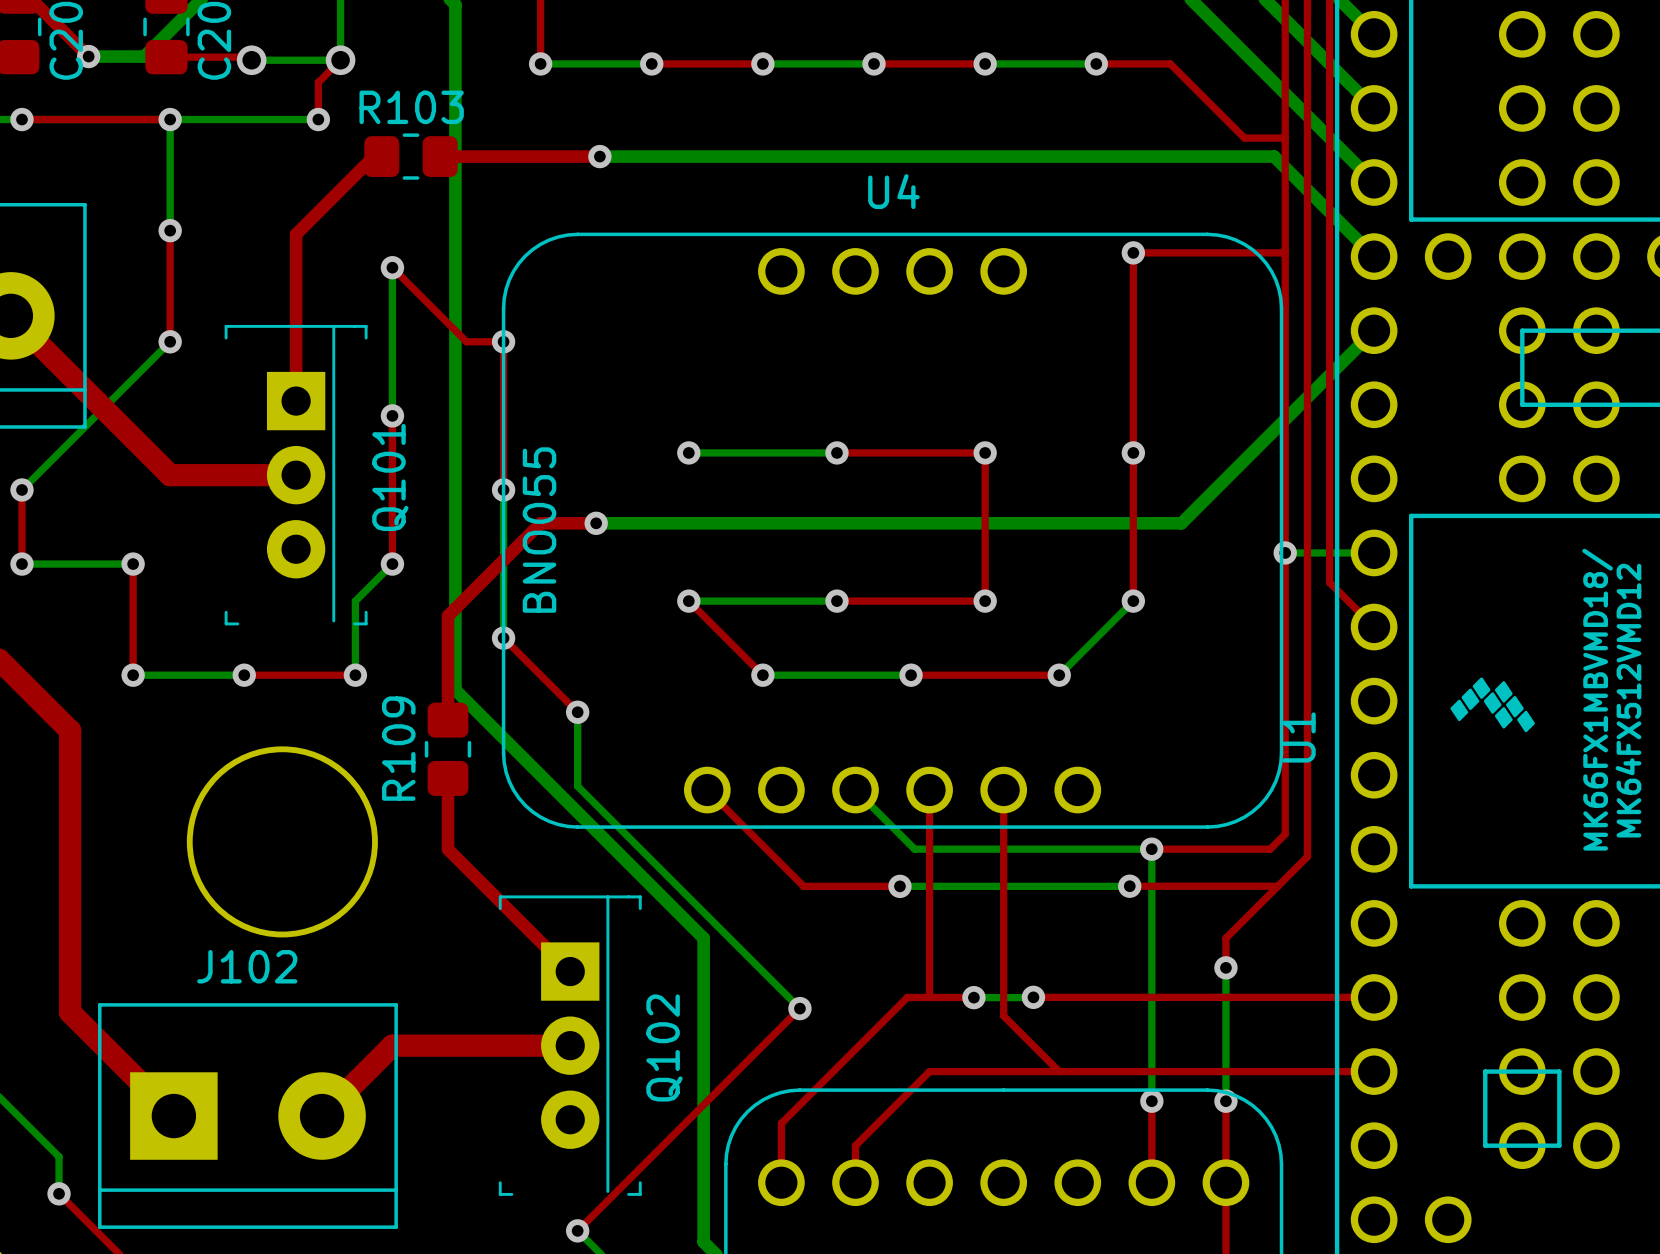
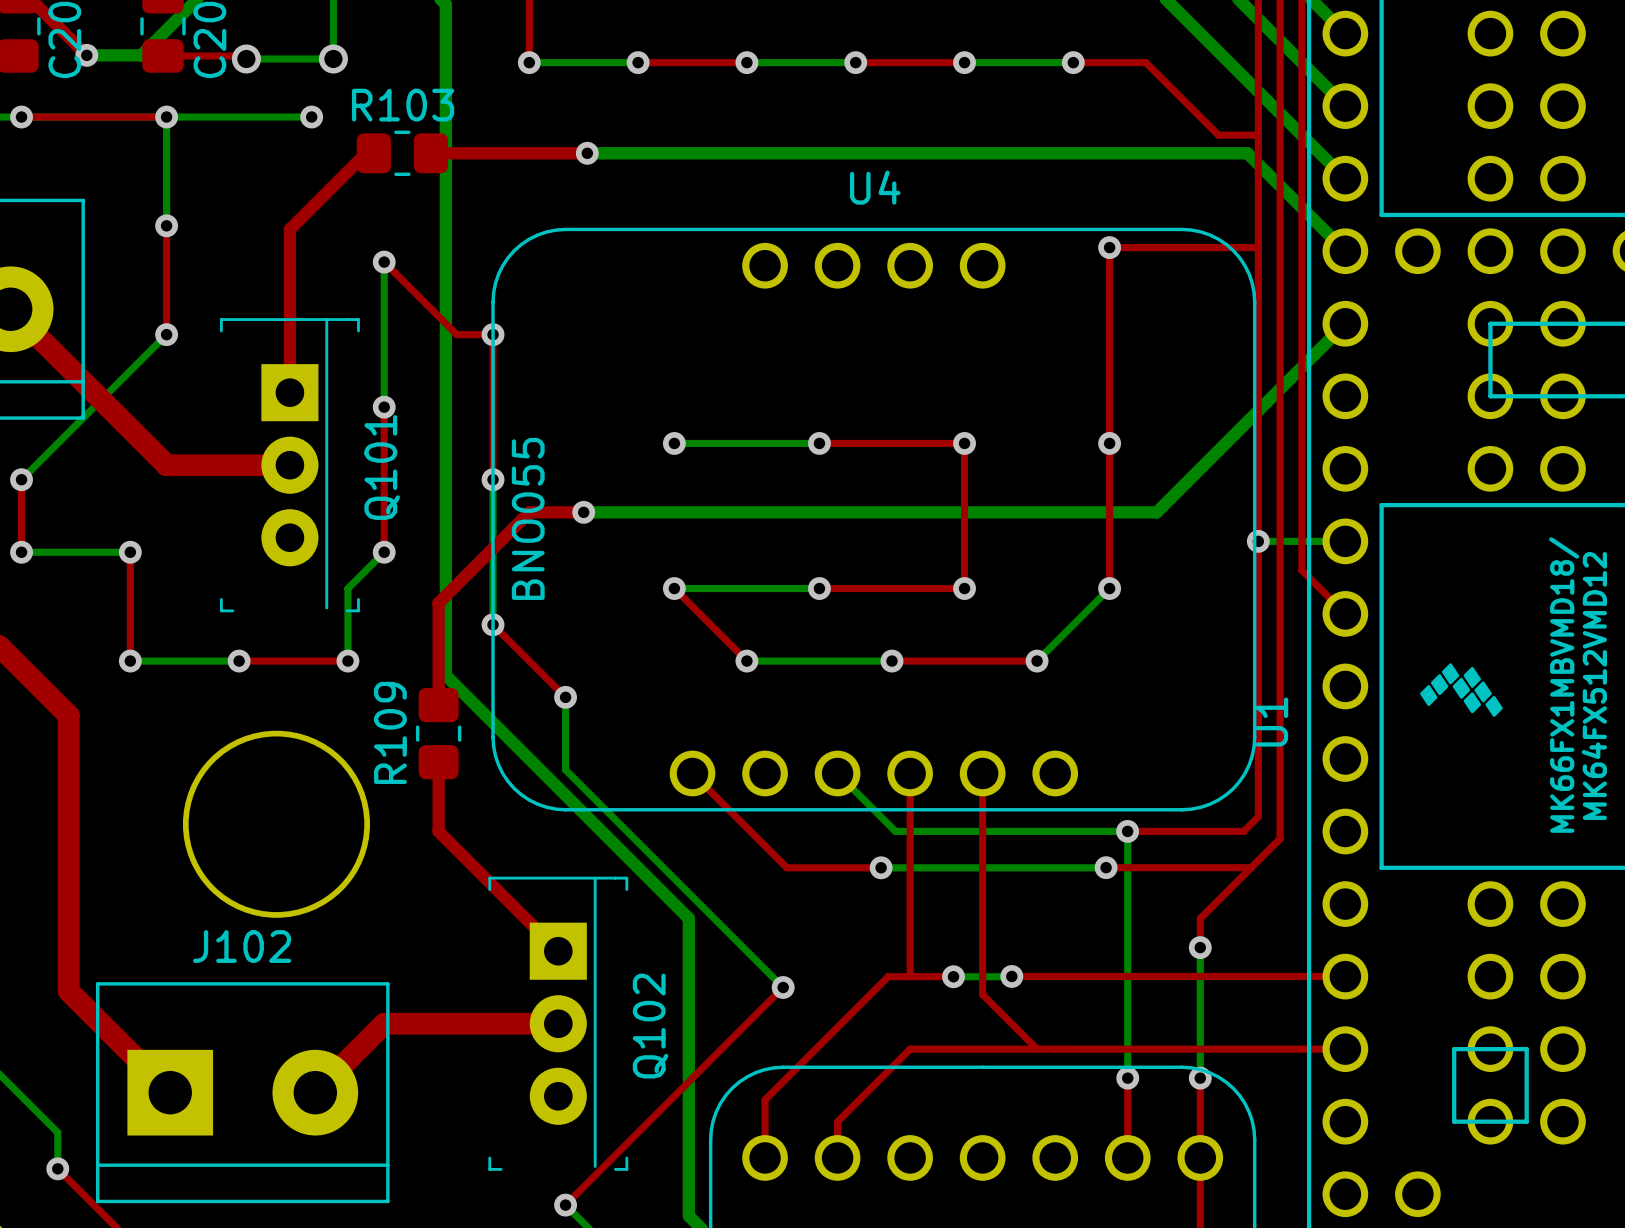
top track: (340, 60) (318, 82) (318, 119) -> none

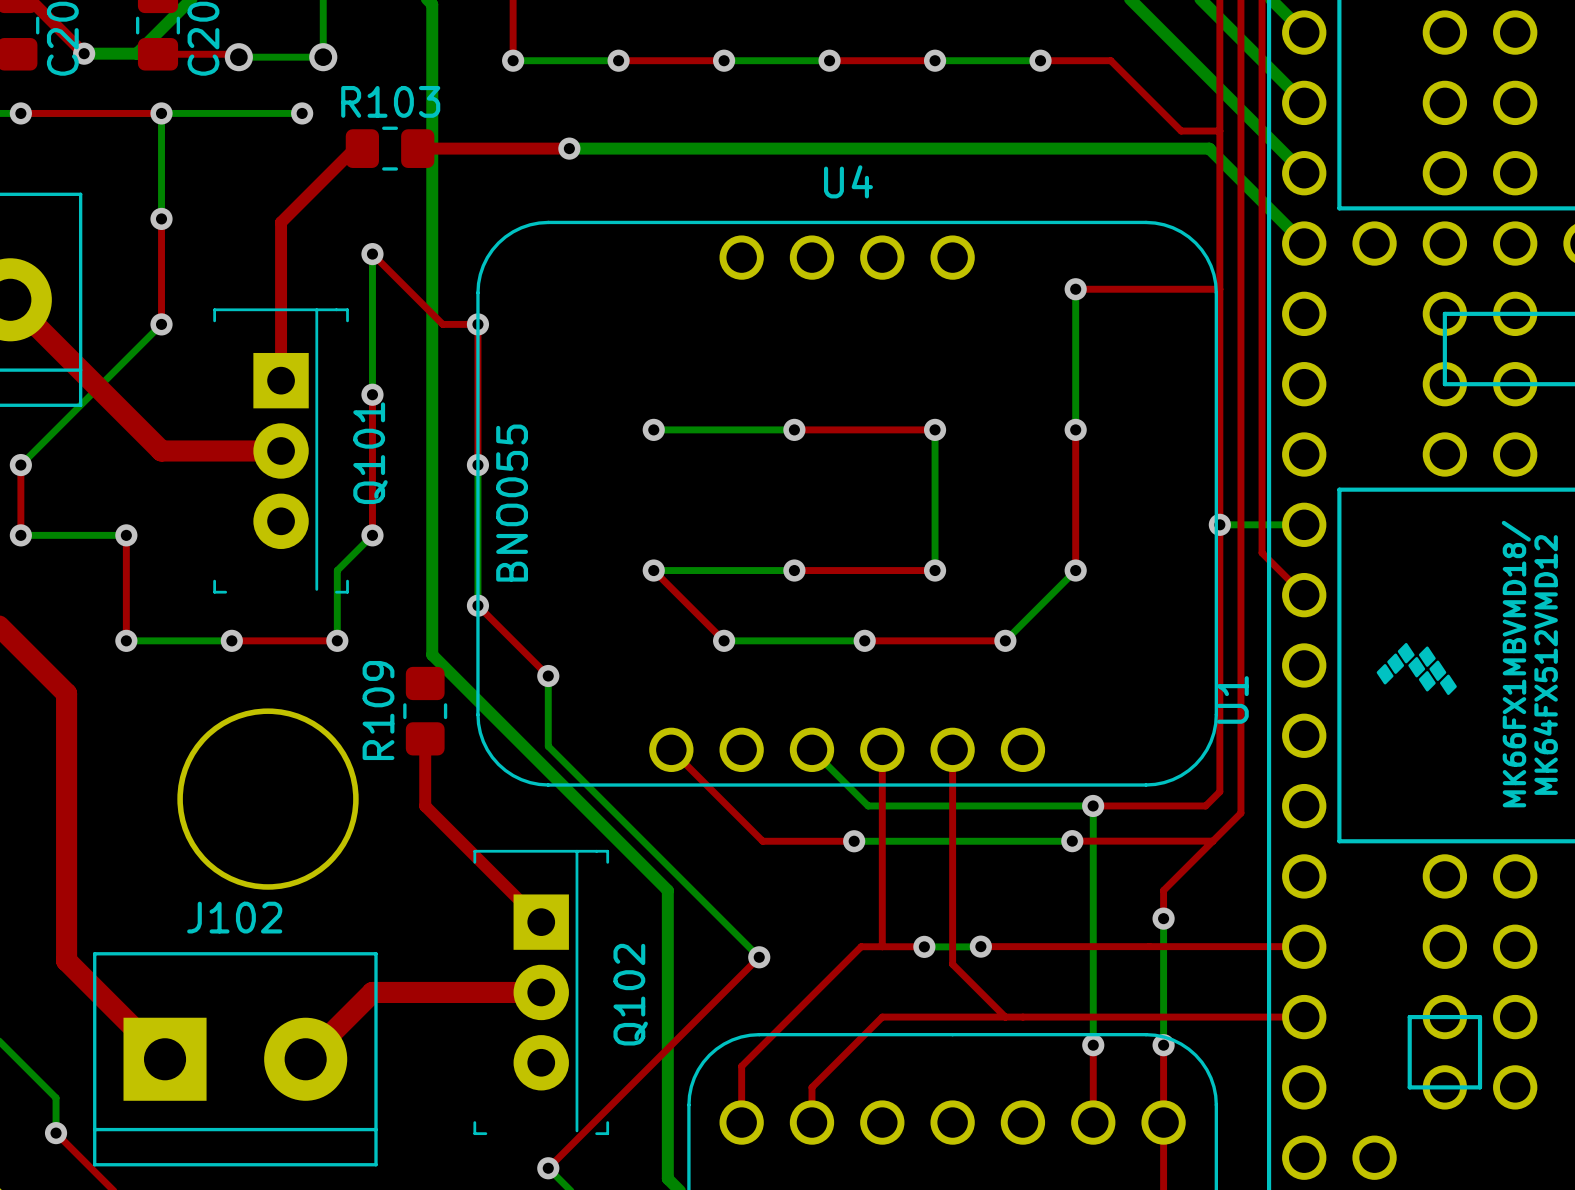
via position: (1109, 247) -> (1075, 289)
top track: (1258, 247) (1109, 247) (1109, 443) -> none
top track: none -> (1075, 289) (1219, 289)
bottom track: none -> (1075, 289) (1075, 429)
bottom track: (1345, 323) (1156, 512) (583, 512) -> none
top track: (964, 443) (964, 588) -> none
bottom track: none -> (935, 429) (935, 570)
top track: (583, 512) (529, 512) (438, 603) (438, 705) (445, 697) -> none
via: (583, 512) -> none

